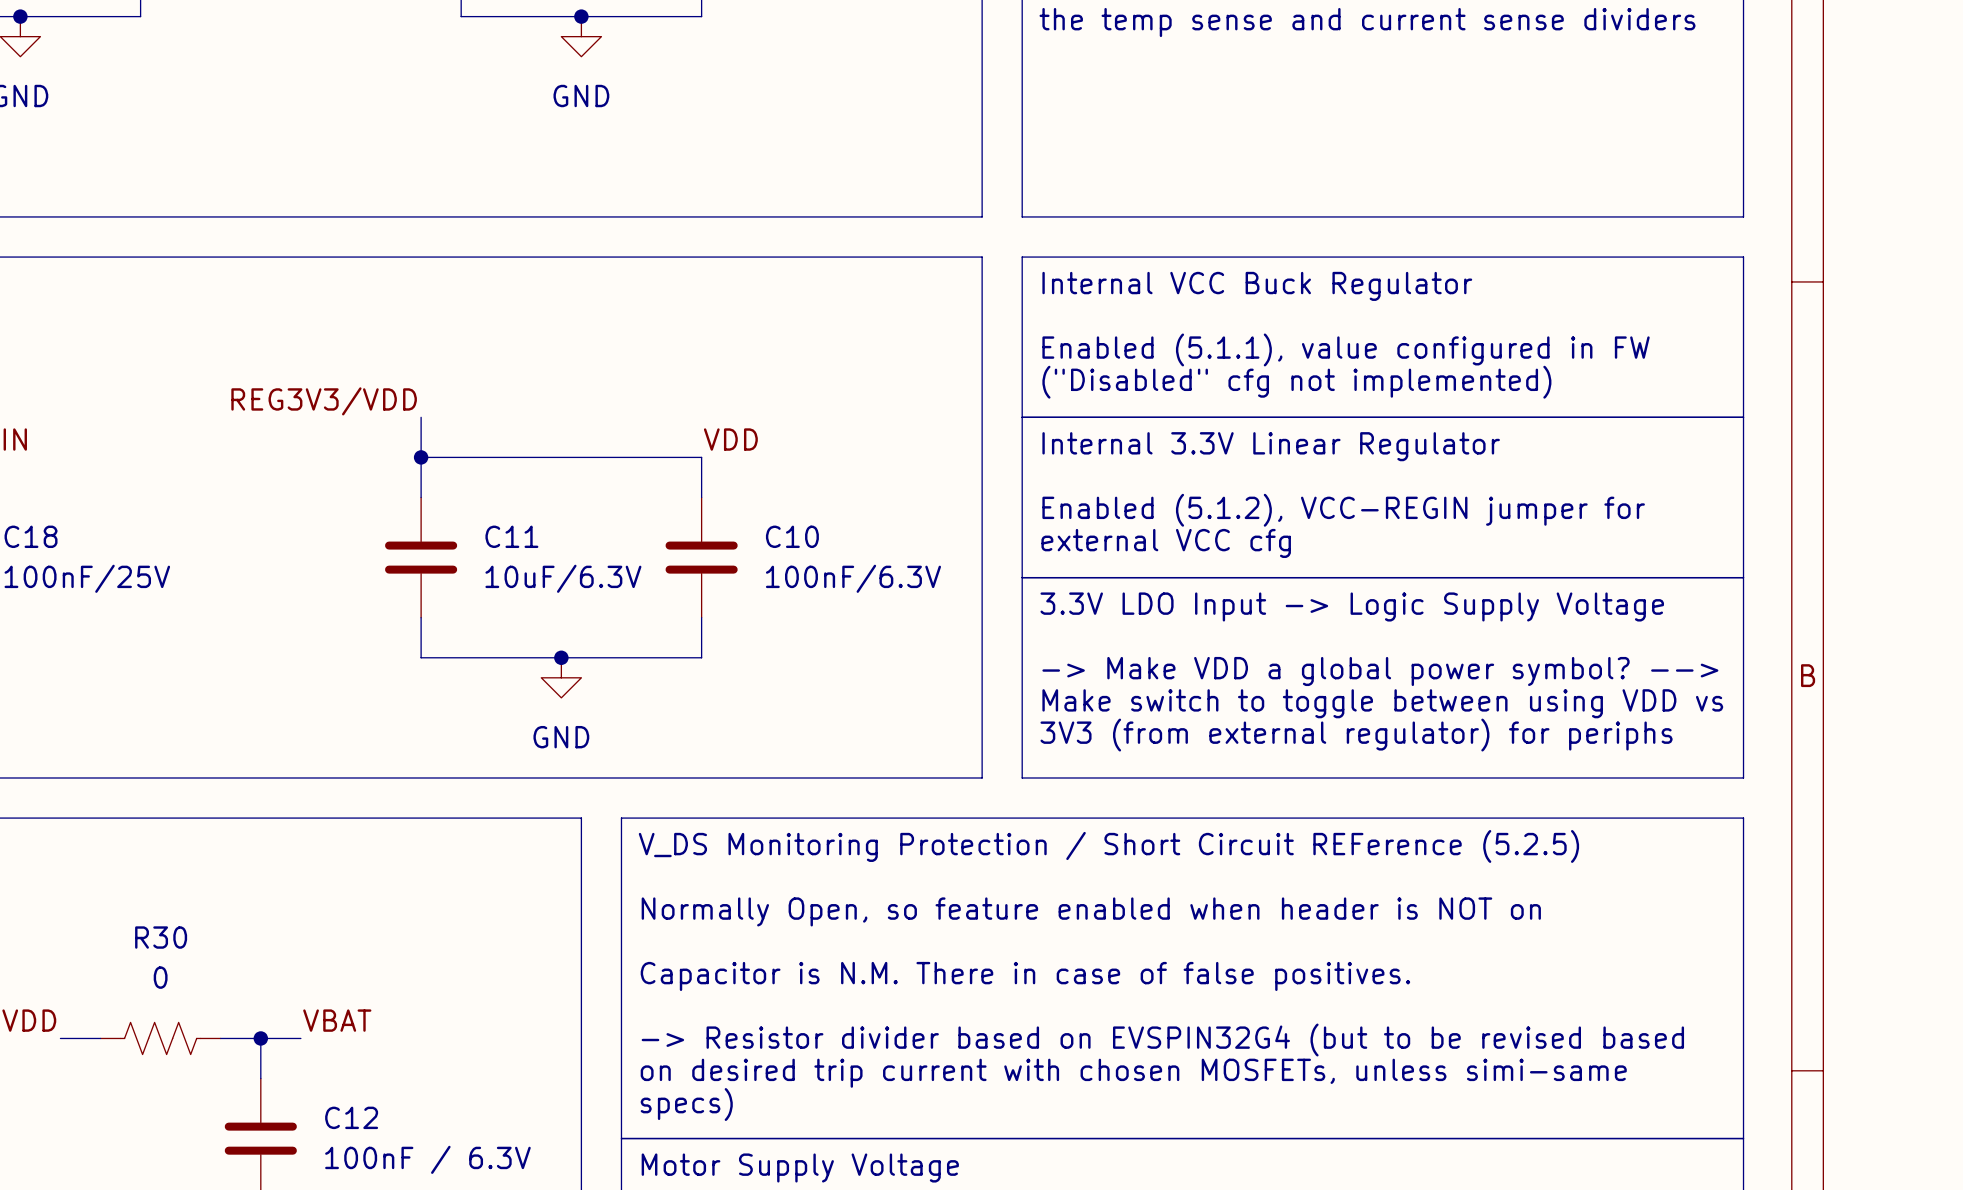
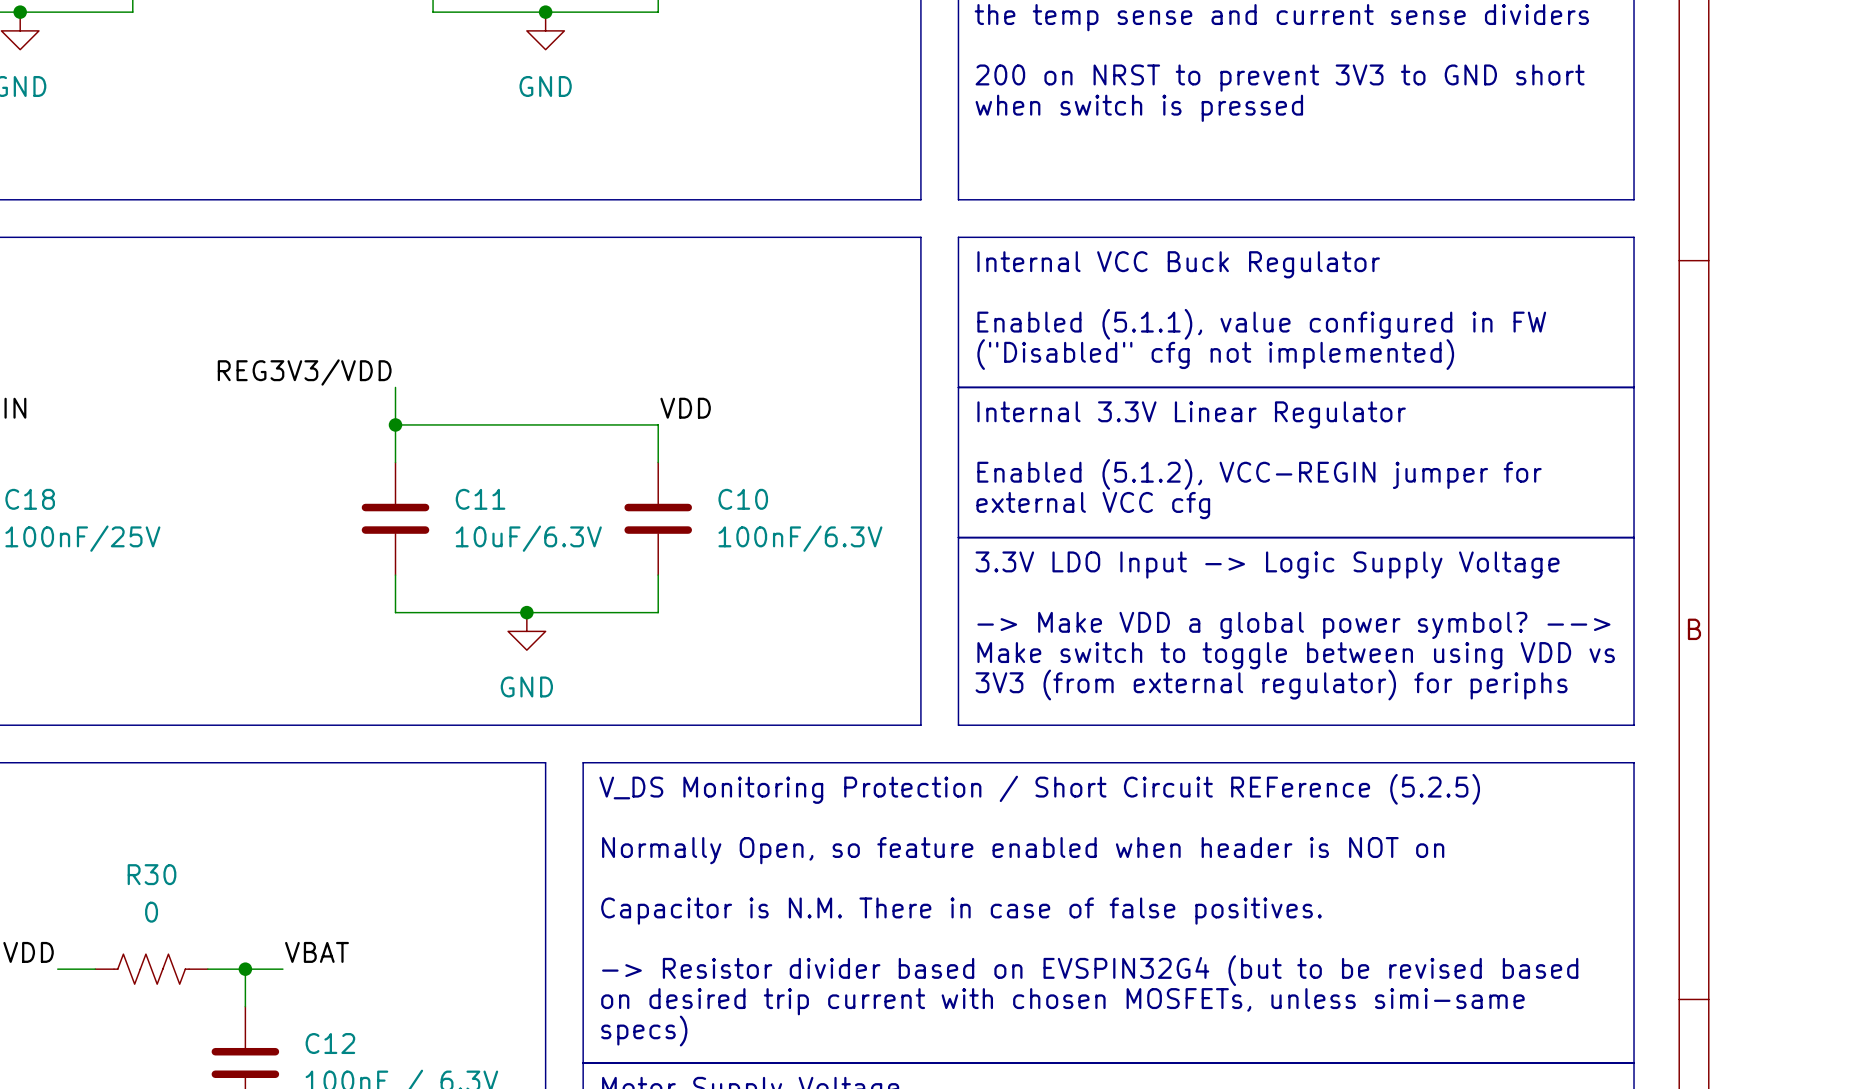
text: none -> 200 on NRST to prevent 3V3 to GND short (1280, 78)
text: none -> when switch is pressed (1139, 108)

